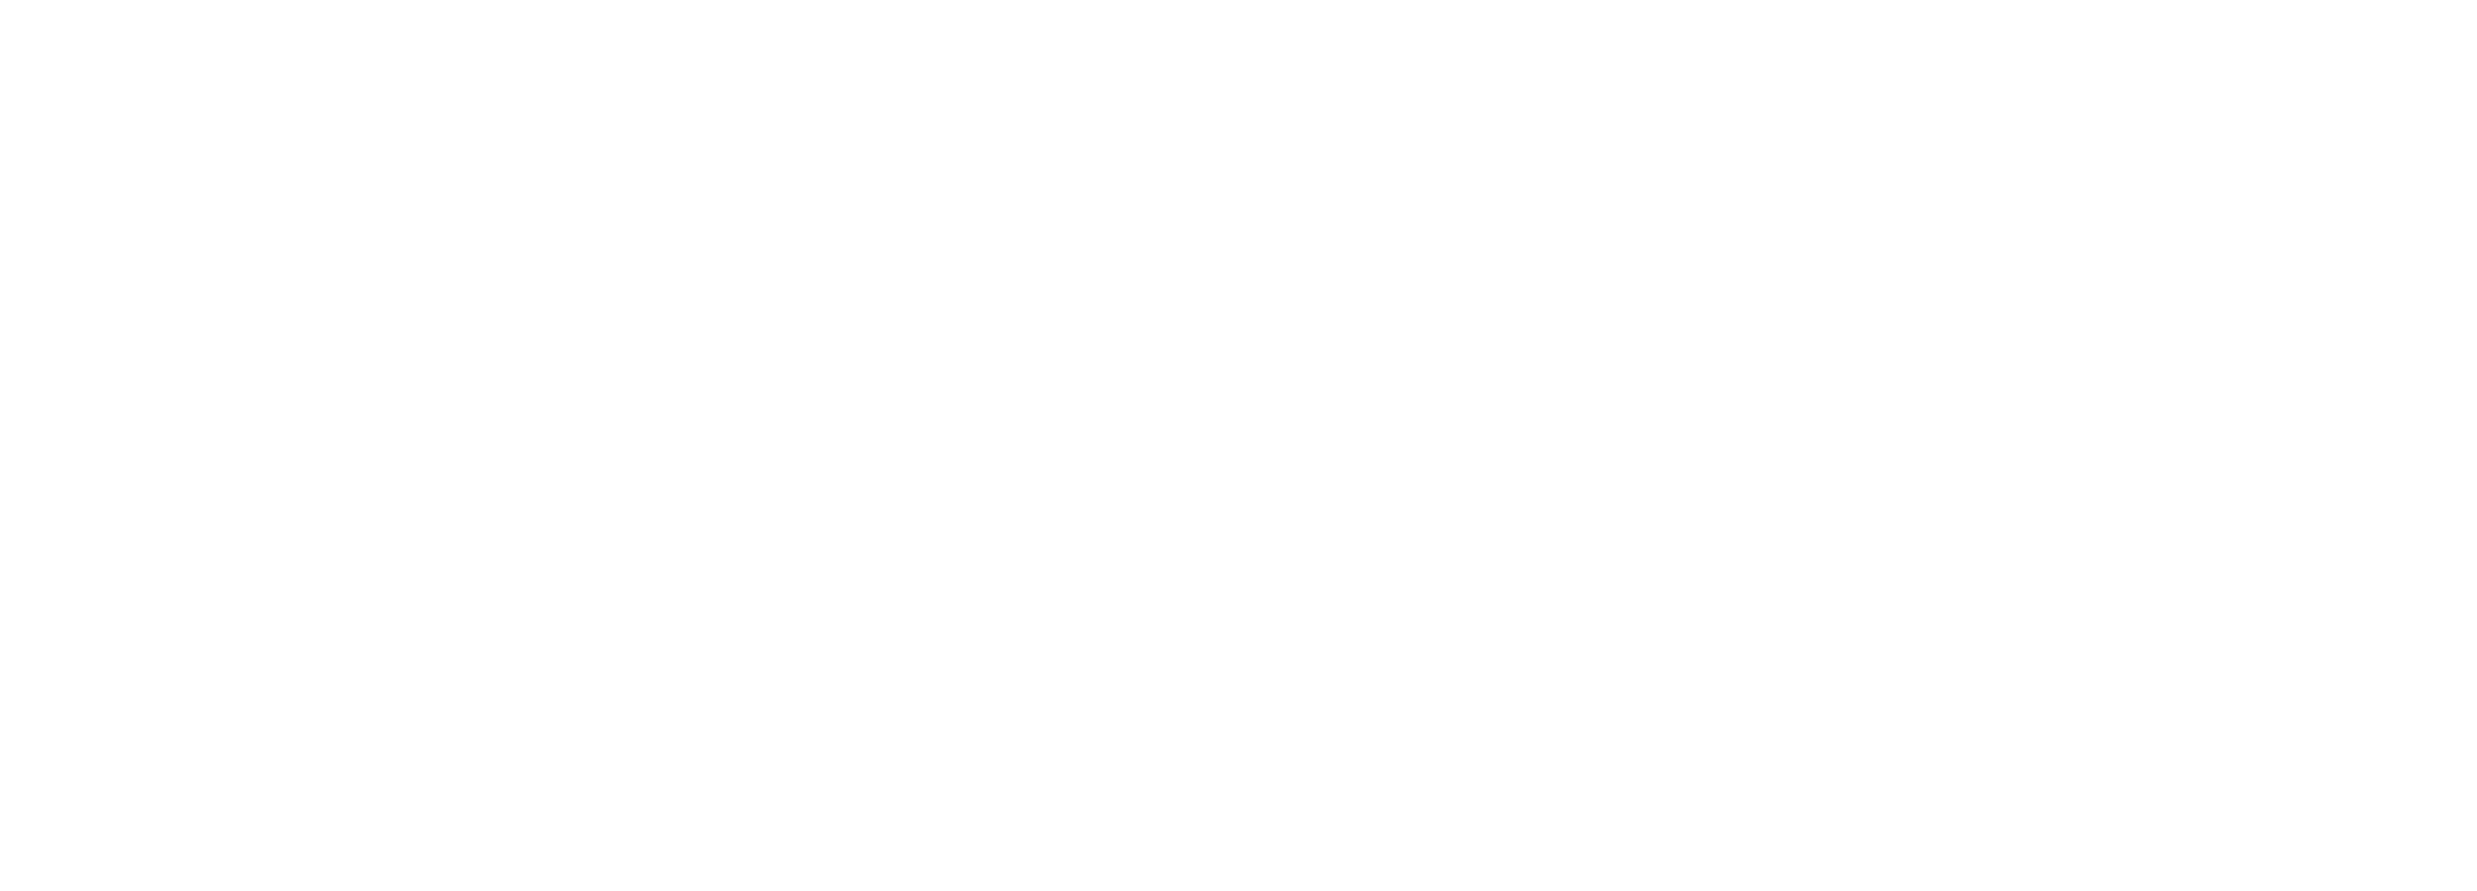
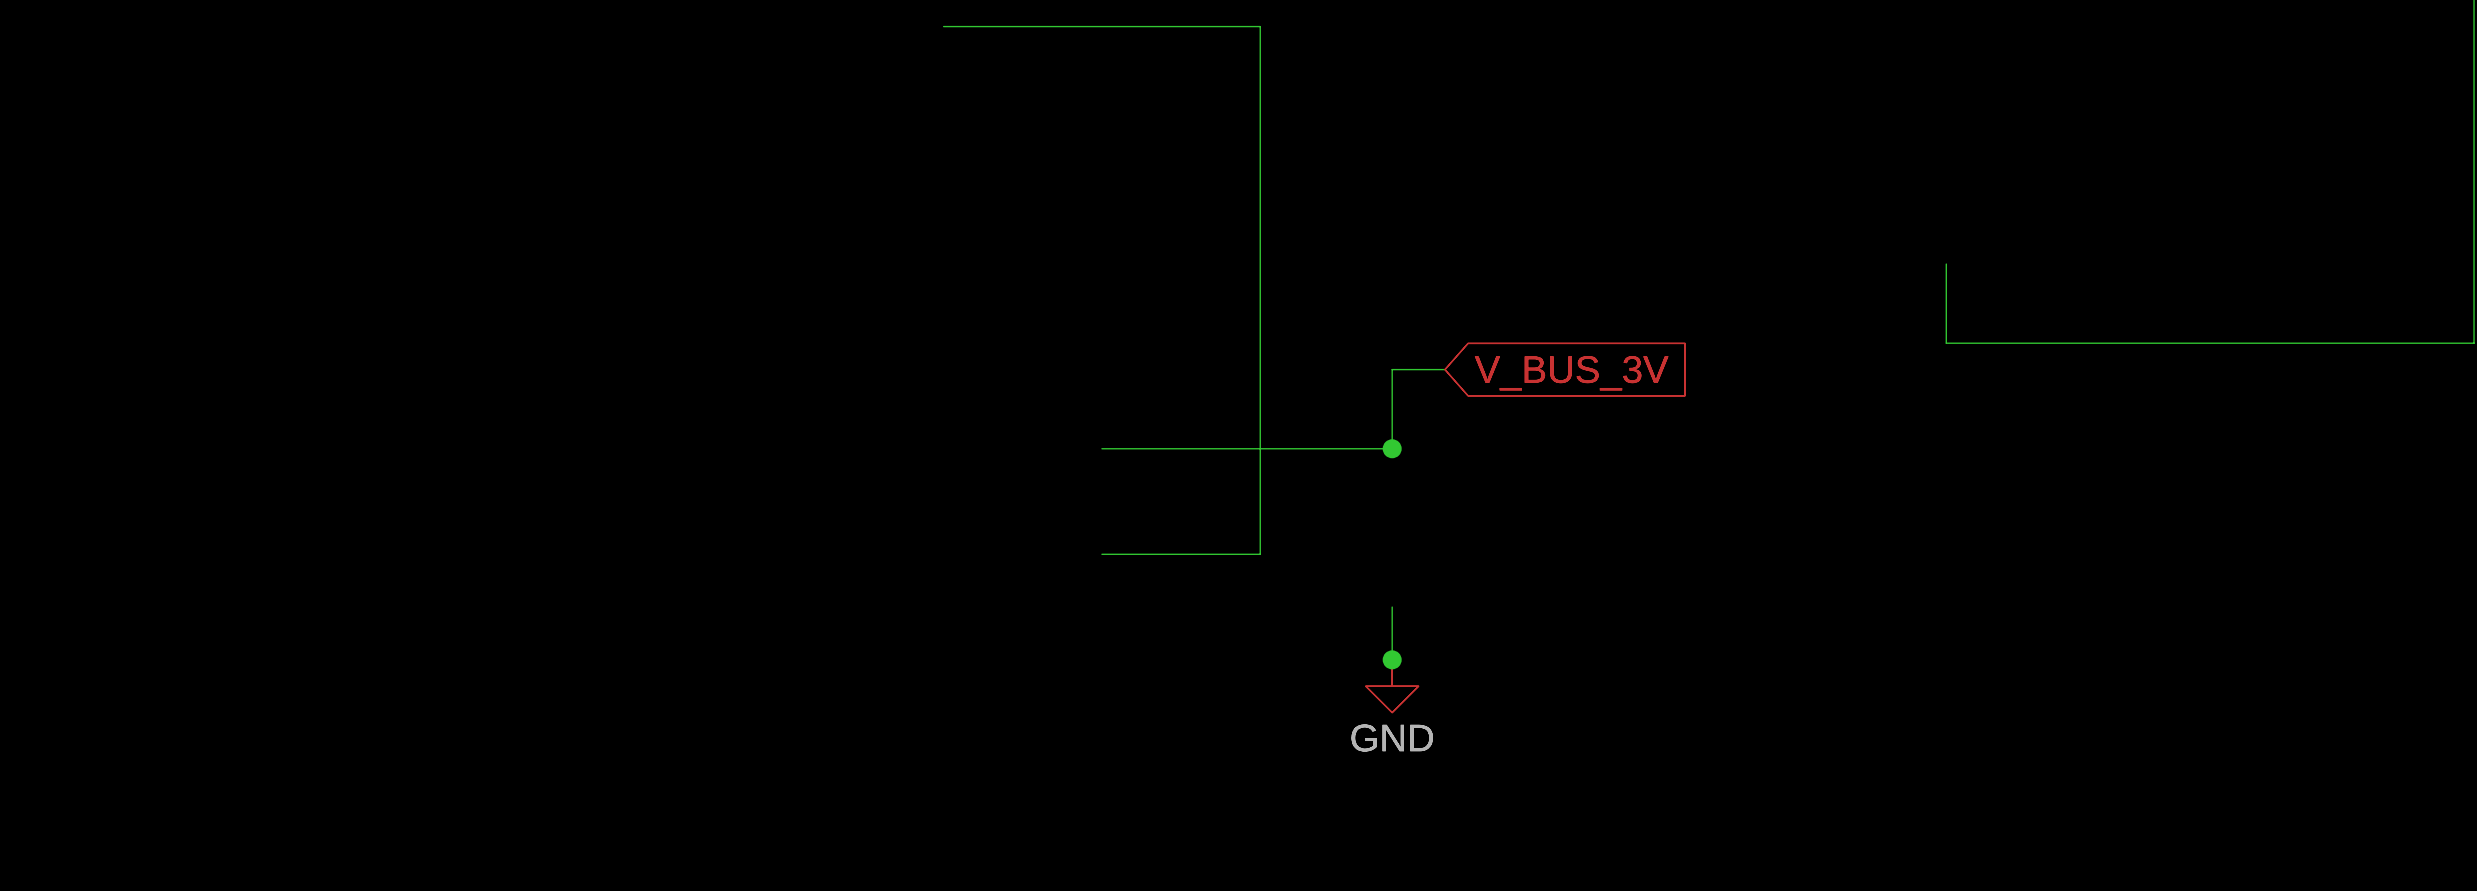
wire: none -> (2474, 0) (2474, 343) (1946, 343) (1946, 264)
wire: none -> (943, 26) (1260, 26) (1260, 554) (1101, 554)
wire: none -> (1444, 369) (1392, 369) (1392, 448) (1101, 448)
global label: none -> V_BUS_3V (1571, 373)
junction: none -> (1392, 448)
wire: none -> (1392, 607) (1392, 659)
junction: none -> (1392, 659)
power symbol: none -> GND (1392, 686)

